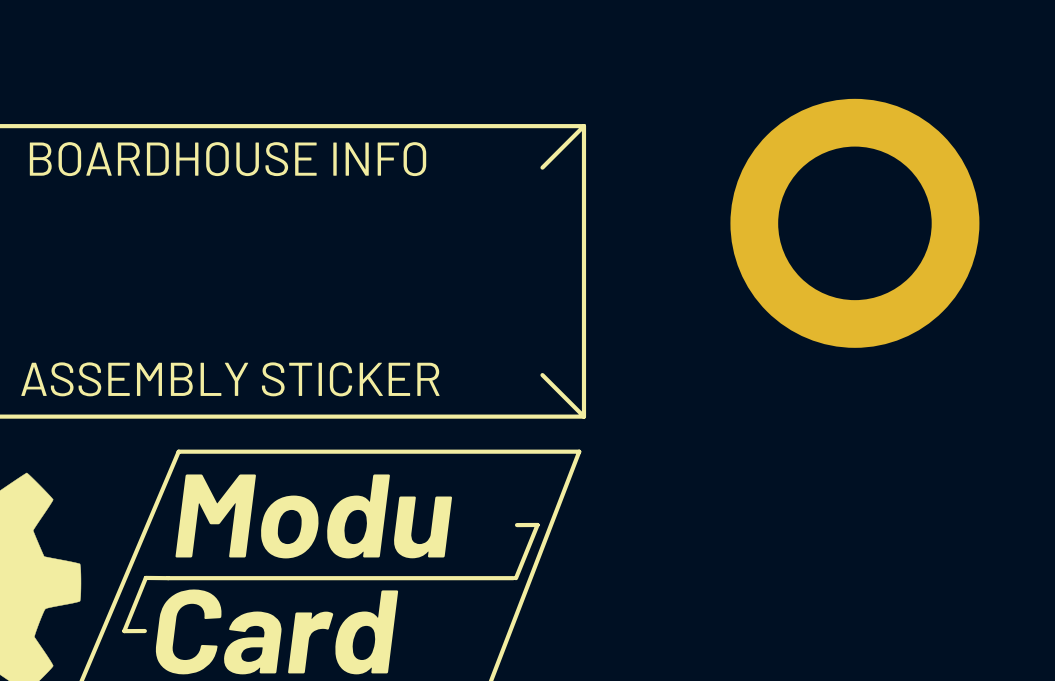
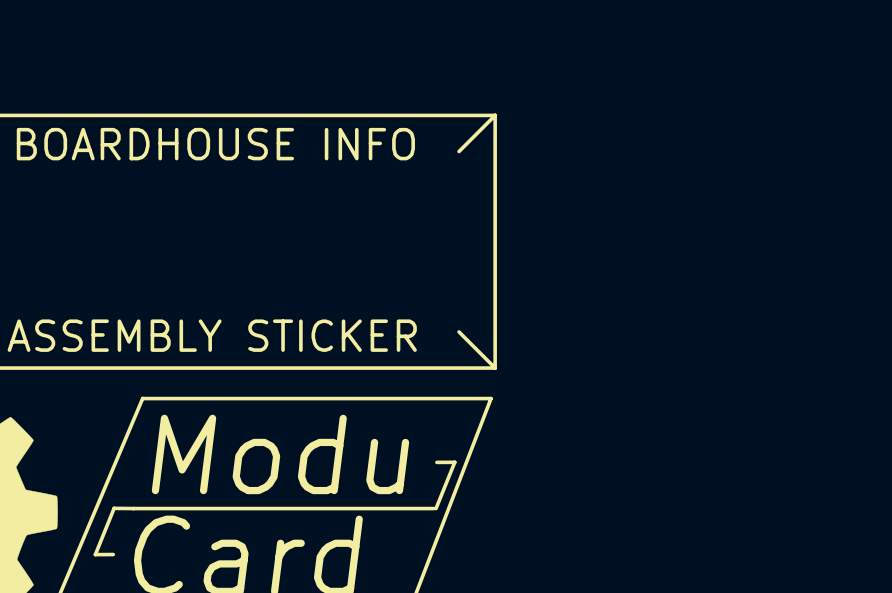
part: (854, 223) -> none

